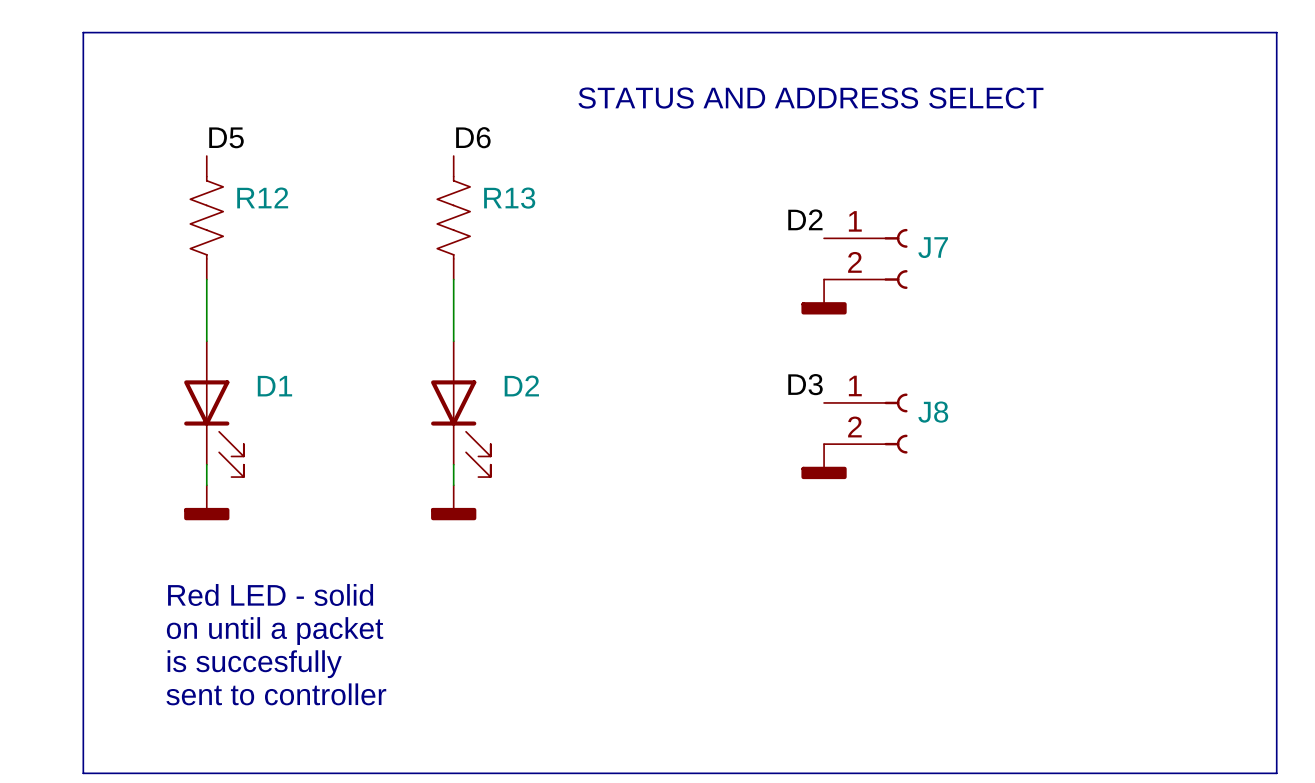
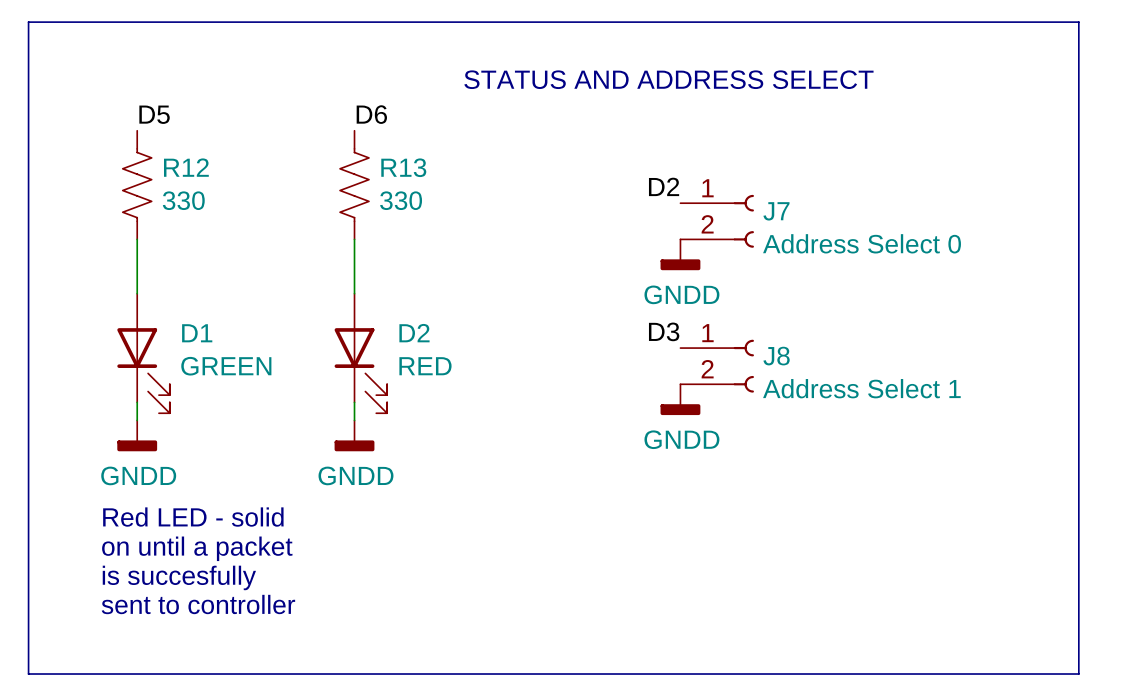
R12 value: none -> 330 (183, 200)
R13 value: none -> 330 (401, 200)
J7 value: none -> Address Select 0 (862, 243)
power symbol text: none -> GNDD (681, 294)
D1 value: none -> GREEN (226, 366)
D2 value: none -> RED (425, 366)
J8 value: none -> Address Select 1 (861, 388)
power symbol text: none -> GNDD (681, 439)
power symbol text: none -> GNDD (138, 475)
power symbol text: none -> GNDD (355, 475)

